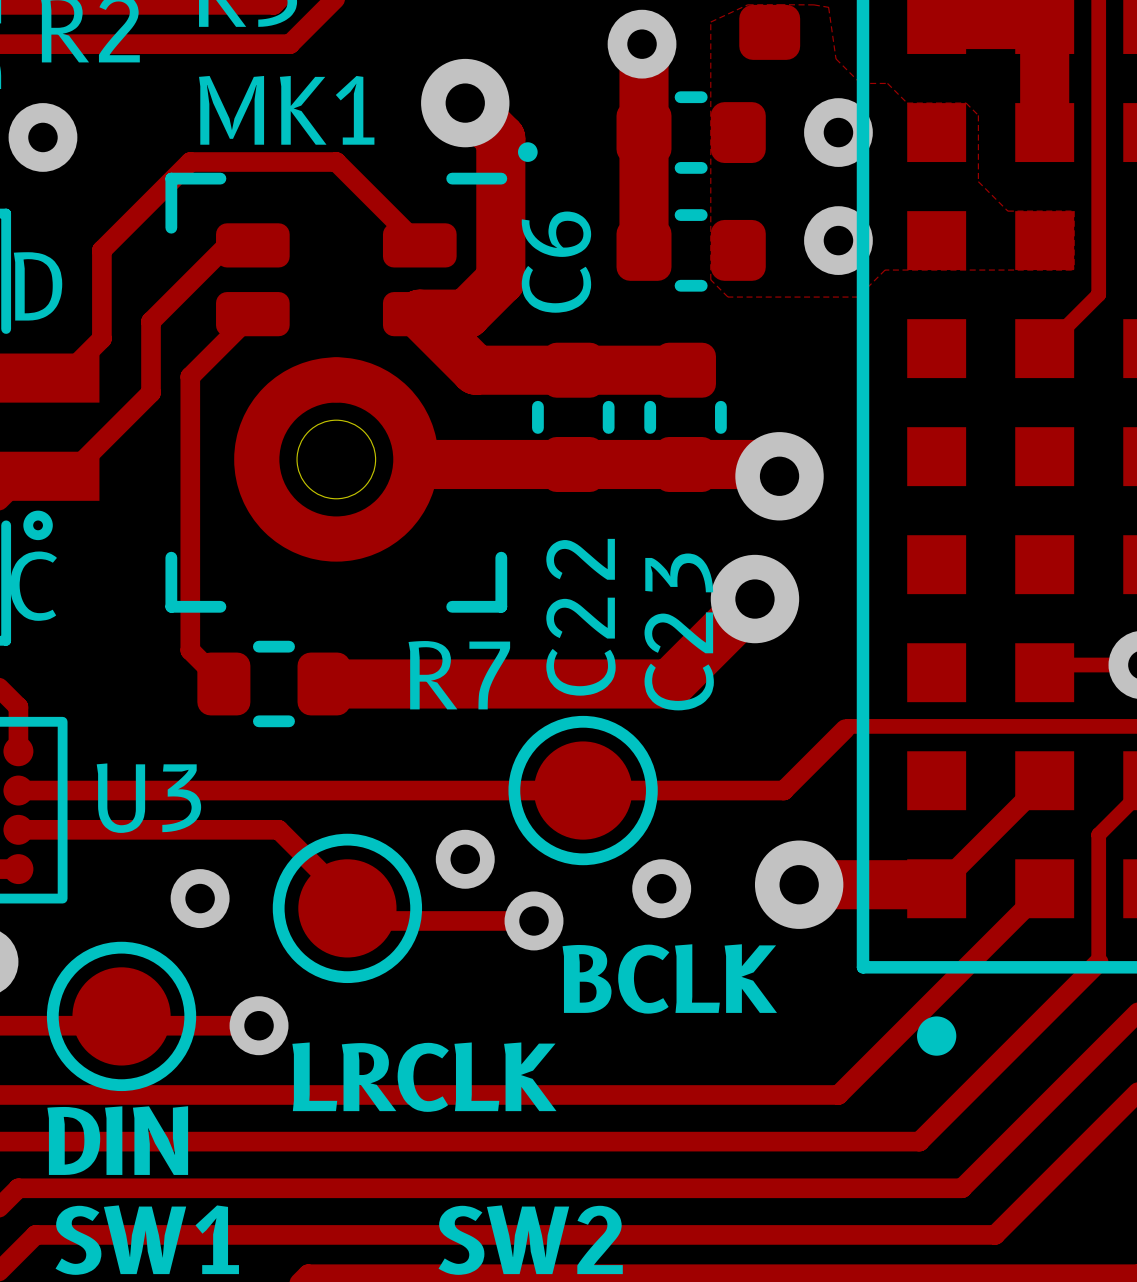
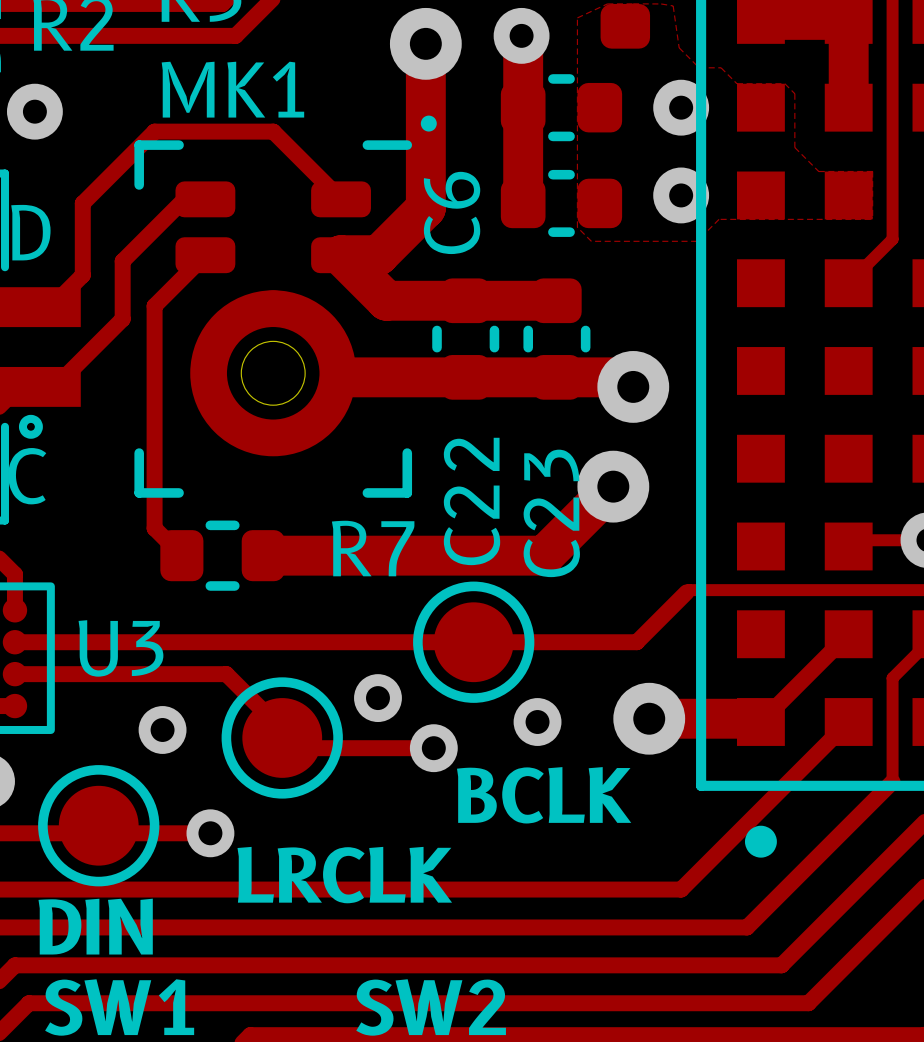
track: (465, 103) (500, 138) (500, 279) -> (425, 43) (425, 208) (406, 227)
via position: (465, 103) -> (425, 43)

